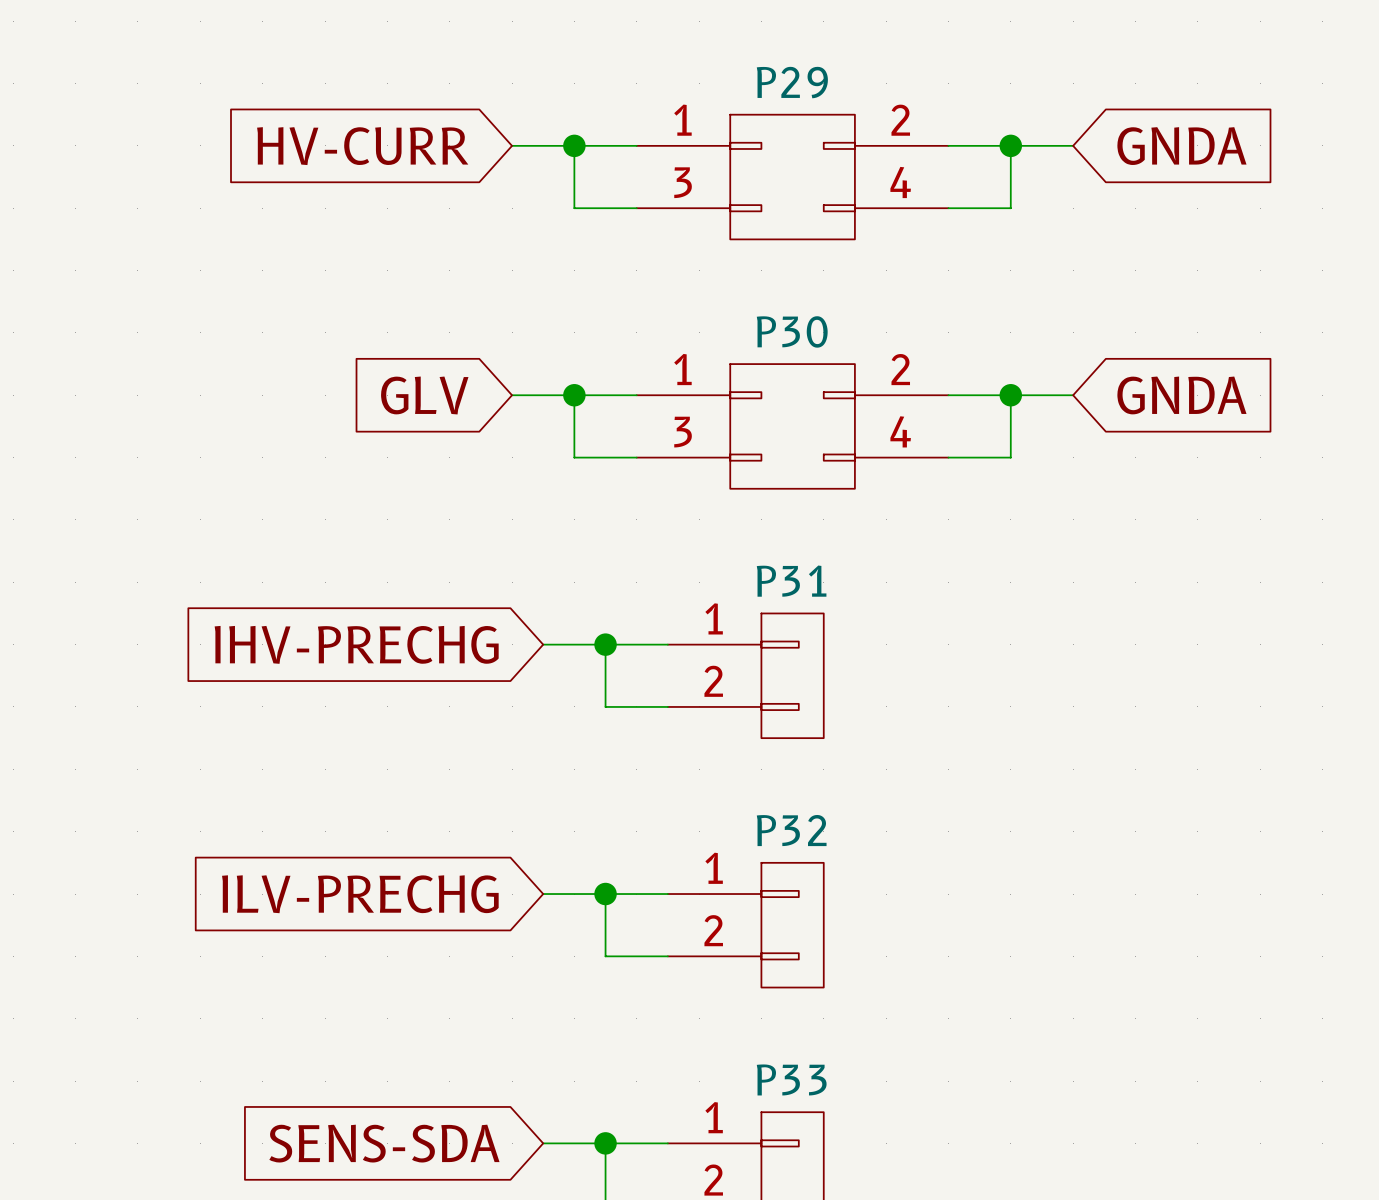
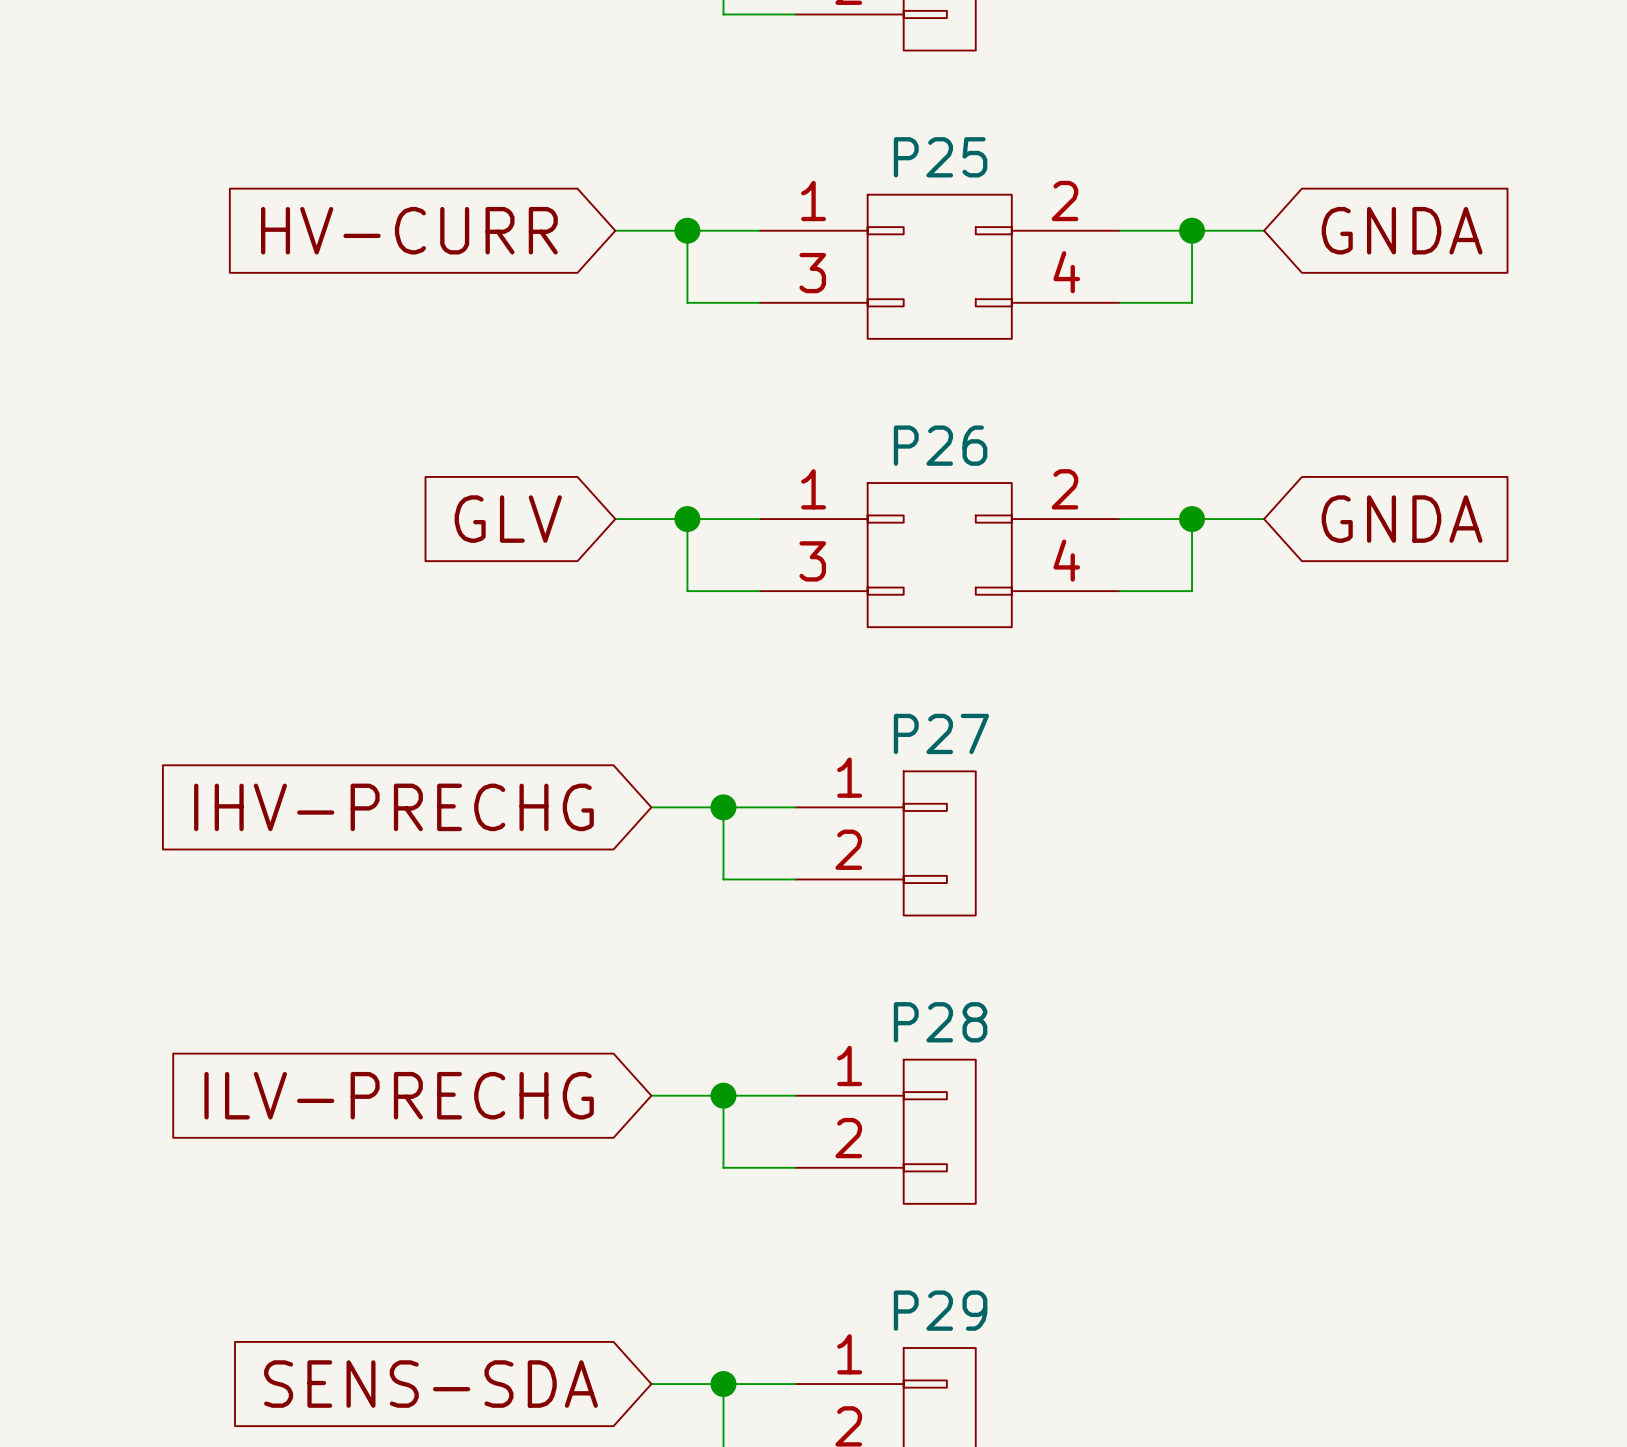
P29 name: P29 (792, 82) -> P25 (940, 157)
P30 name: P30 (792, 331) -> P26 (940, 445)
P31 name: P31 (791, 581) -> P27 (941, 733)
P32 name: P32 (791, 830) -> P28 (940, 1022)
P33 name: P33 (791, 1079) -> P29 (940, 1310)

